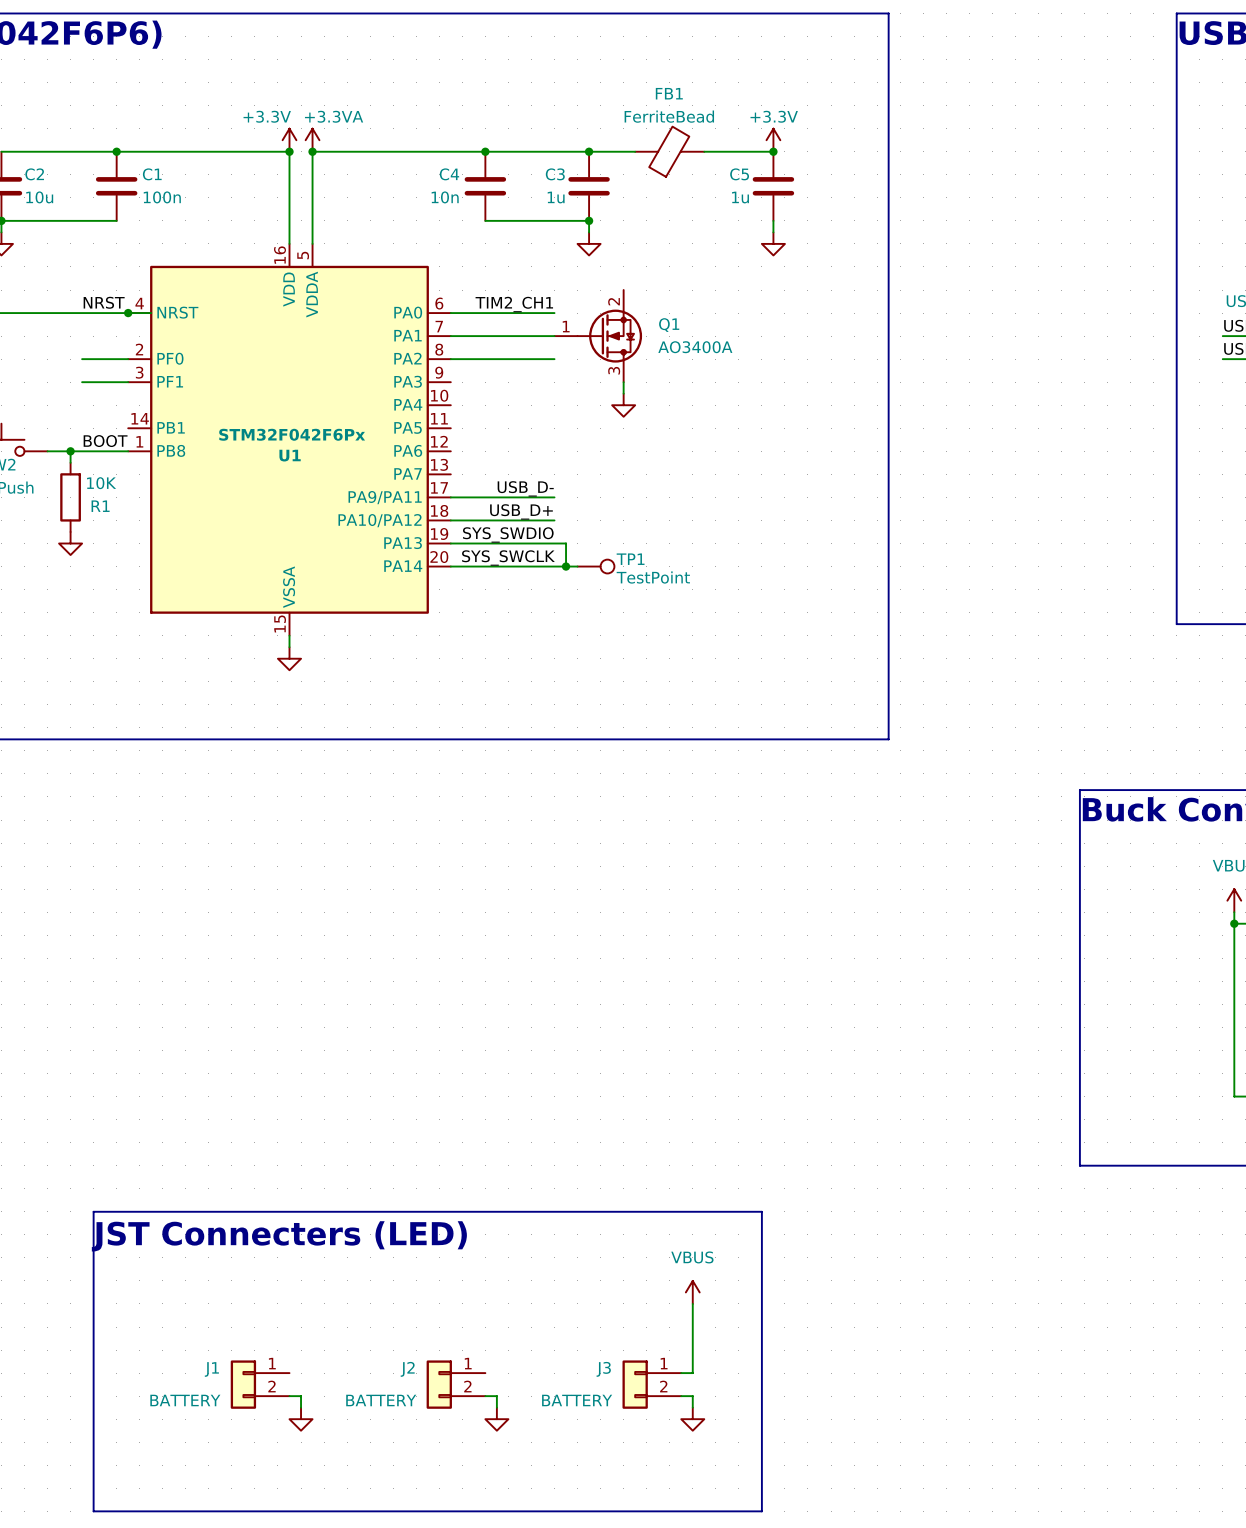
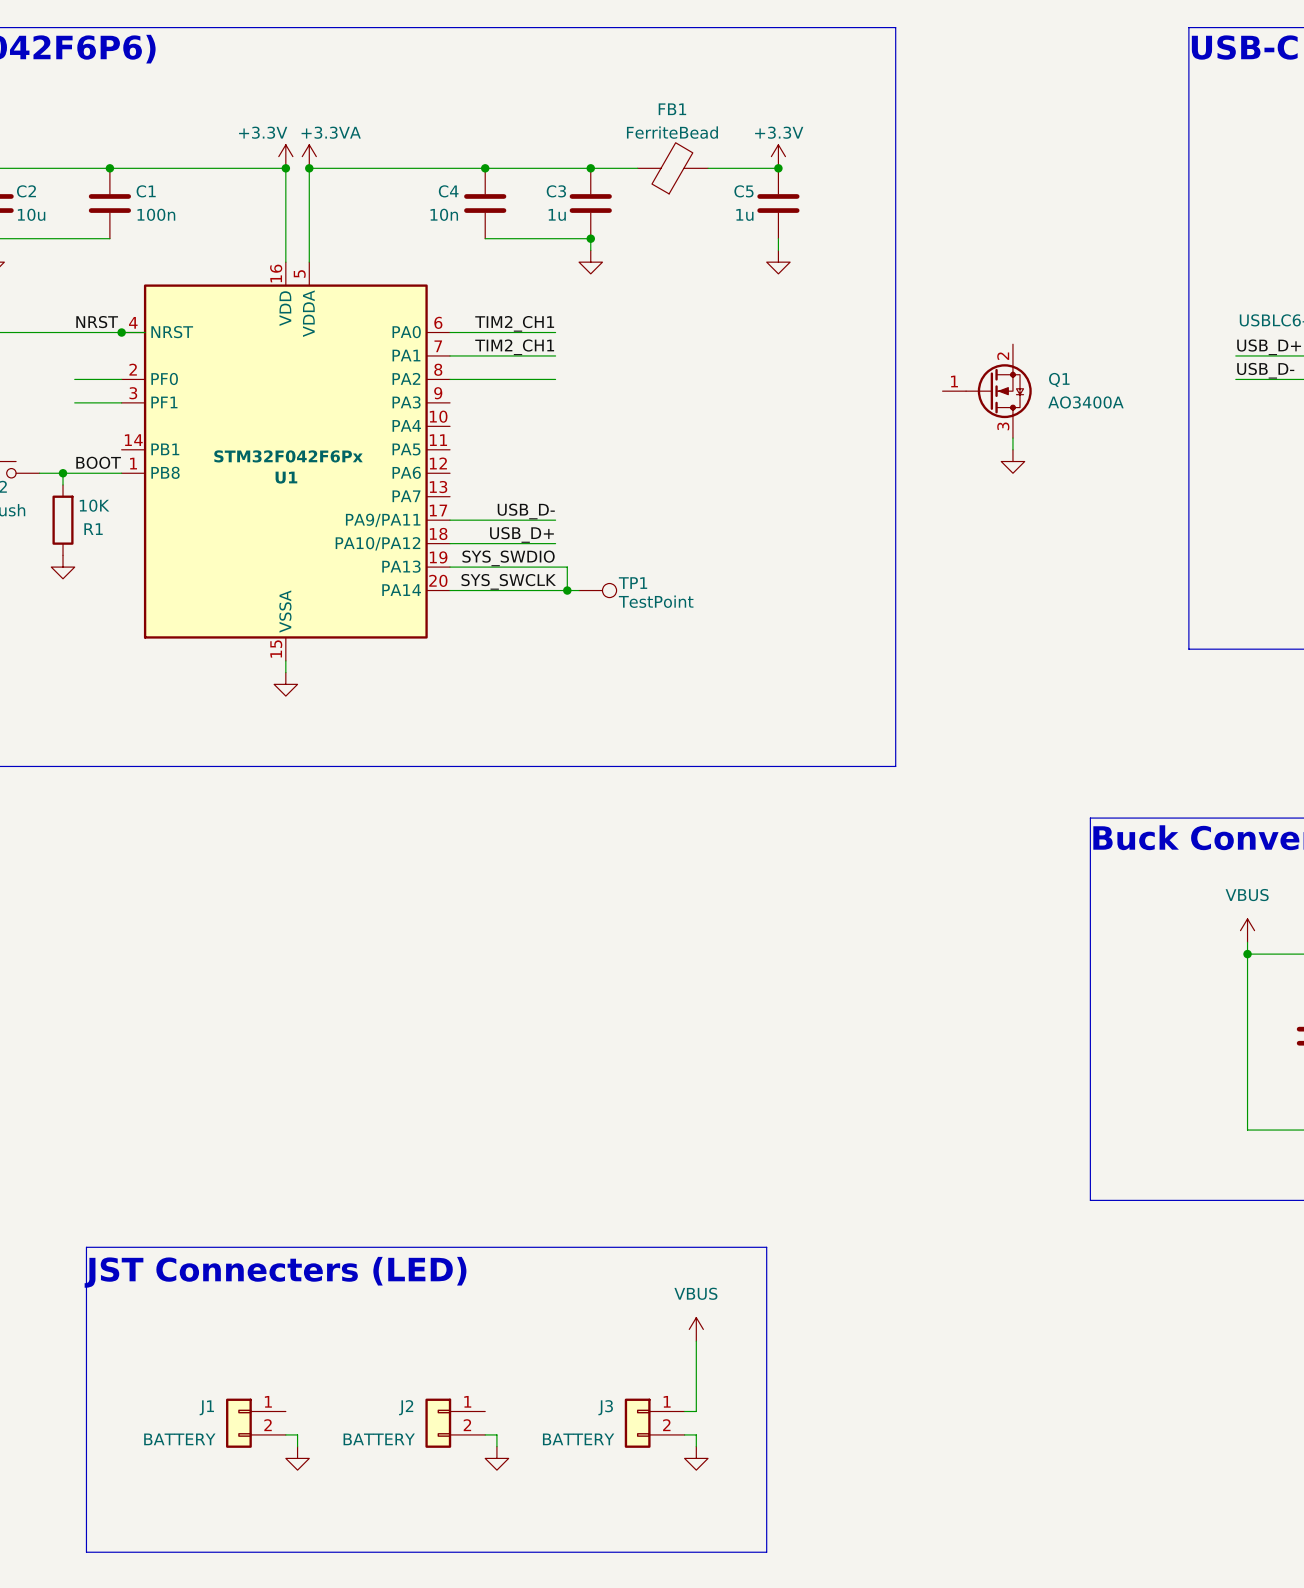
label: none -> TIM2_CH1 (514, 347)
Q1 position: (598, 336) -> (987, 391)
wire: (623, 382) (623, 393) -> none
power symbol: (623, 405) -> none
wire: none -> (1012, 438) (1012, 449)
power symbol: none -> (1012, 461)

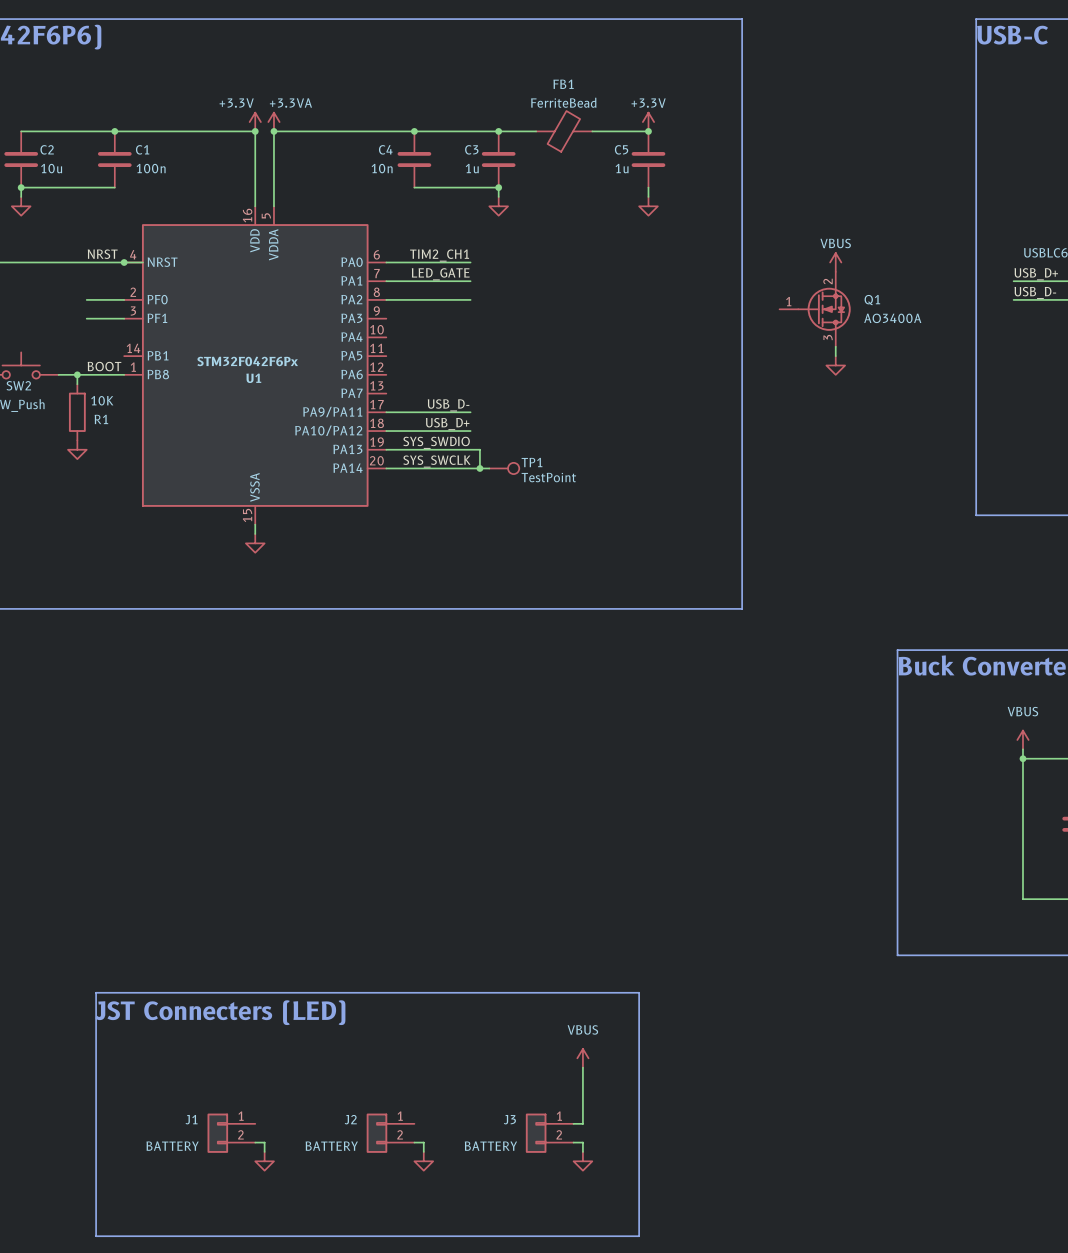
power symbol: none -> VBUS (835, 262)
label: TIM2_CH1 (514, 347) -> LED_GATE (440, 274)

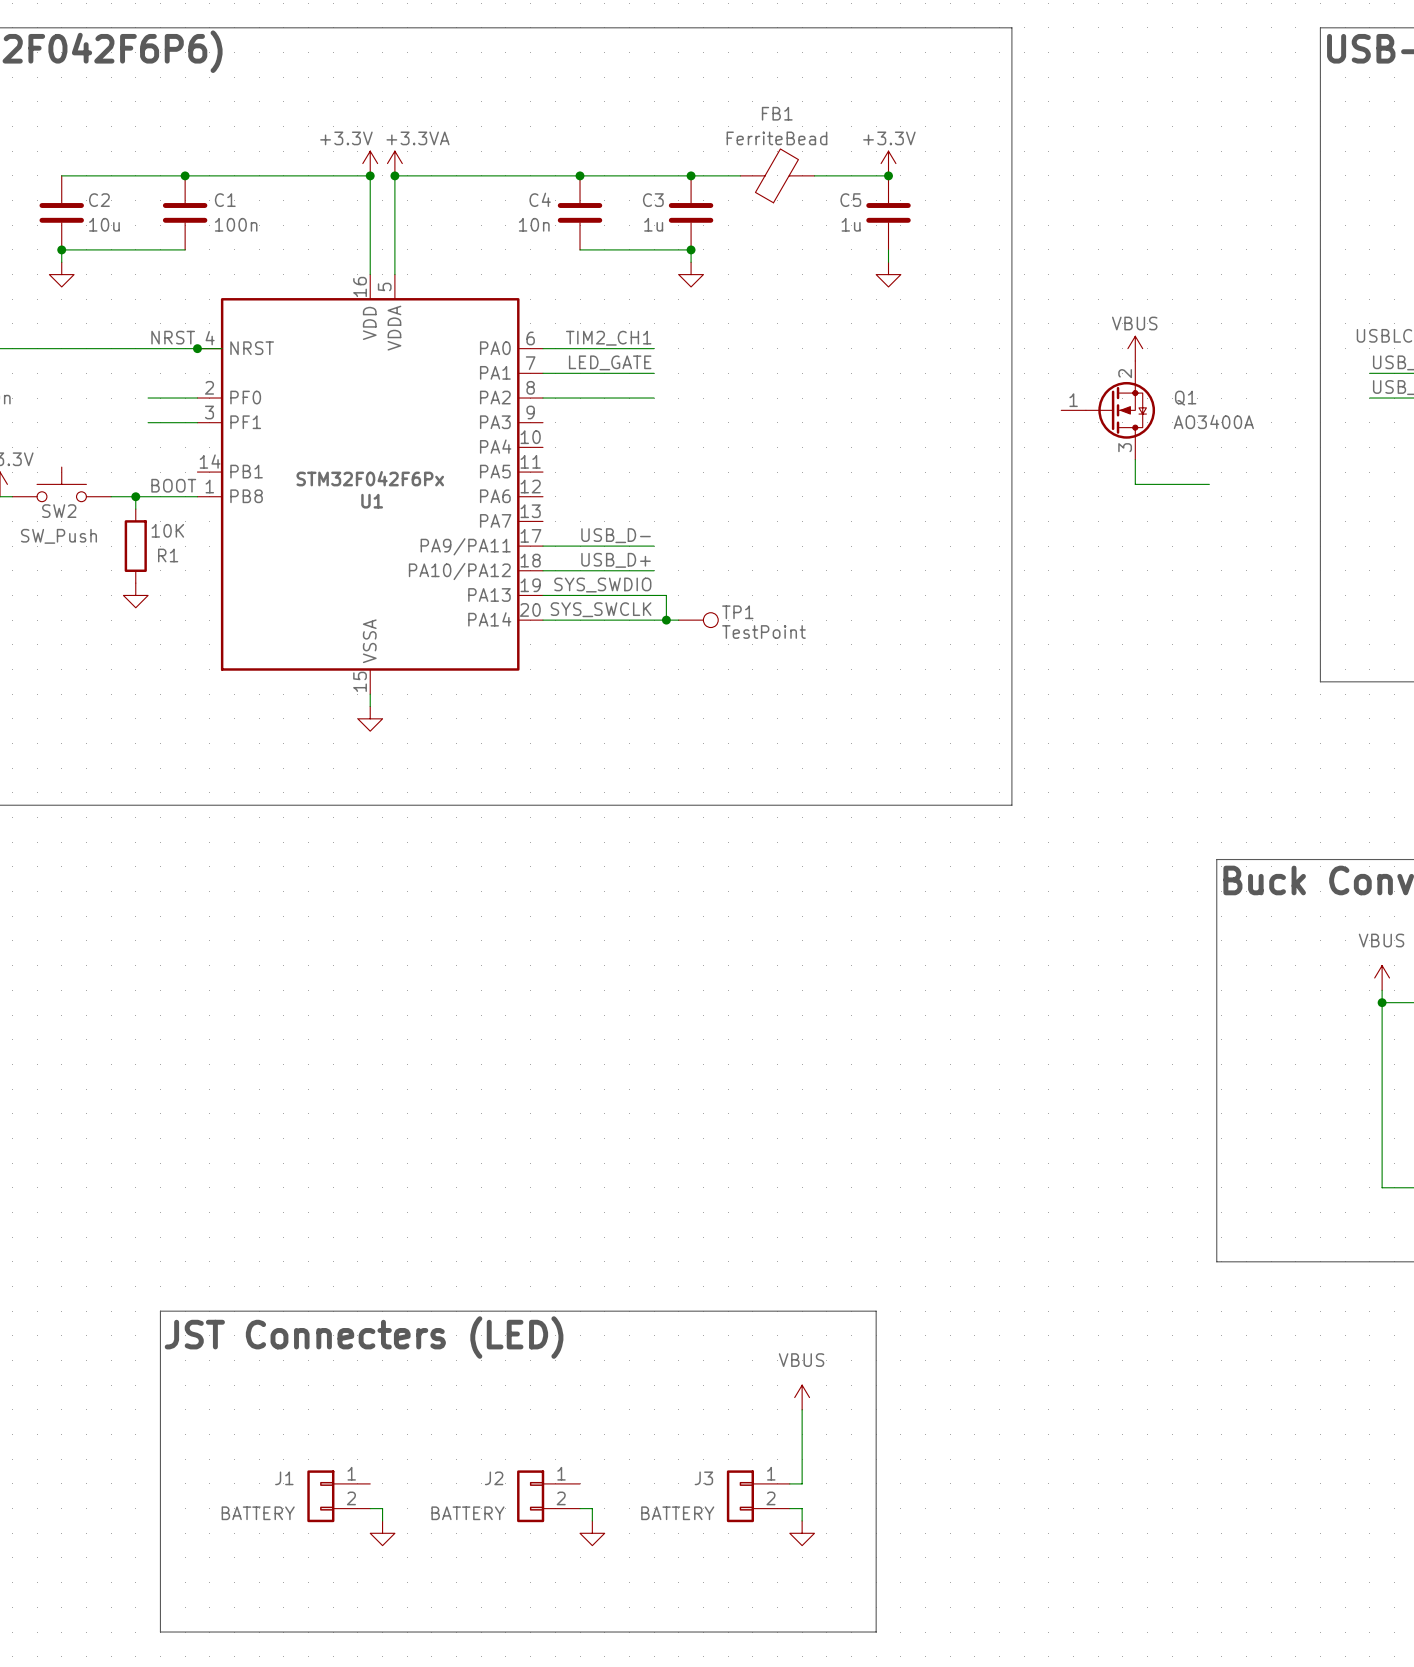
wire: none -> (1135, 472) (1135, 484) (1209, 484)
power symbol: (835, 365) -> none

